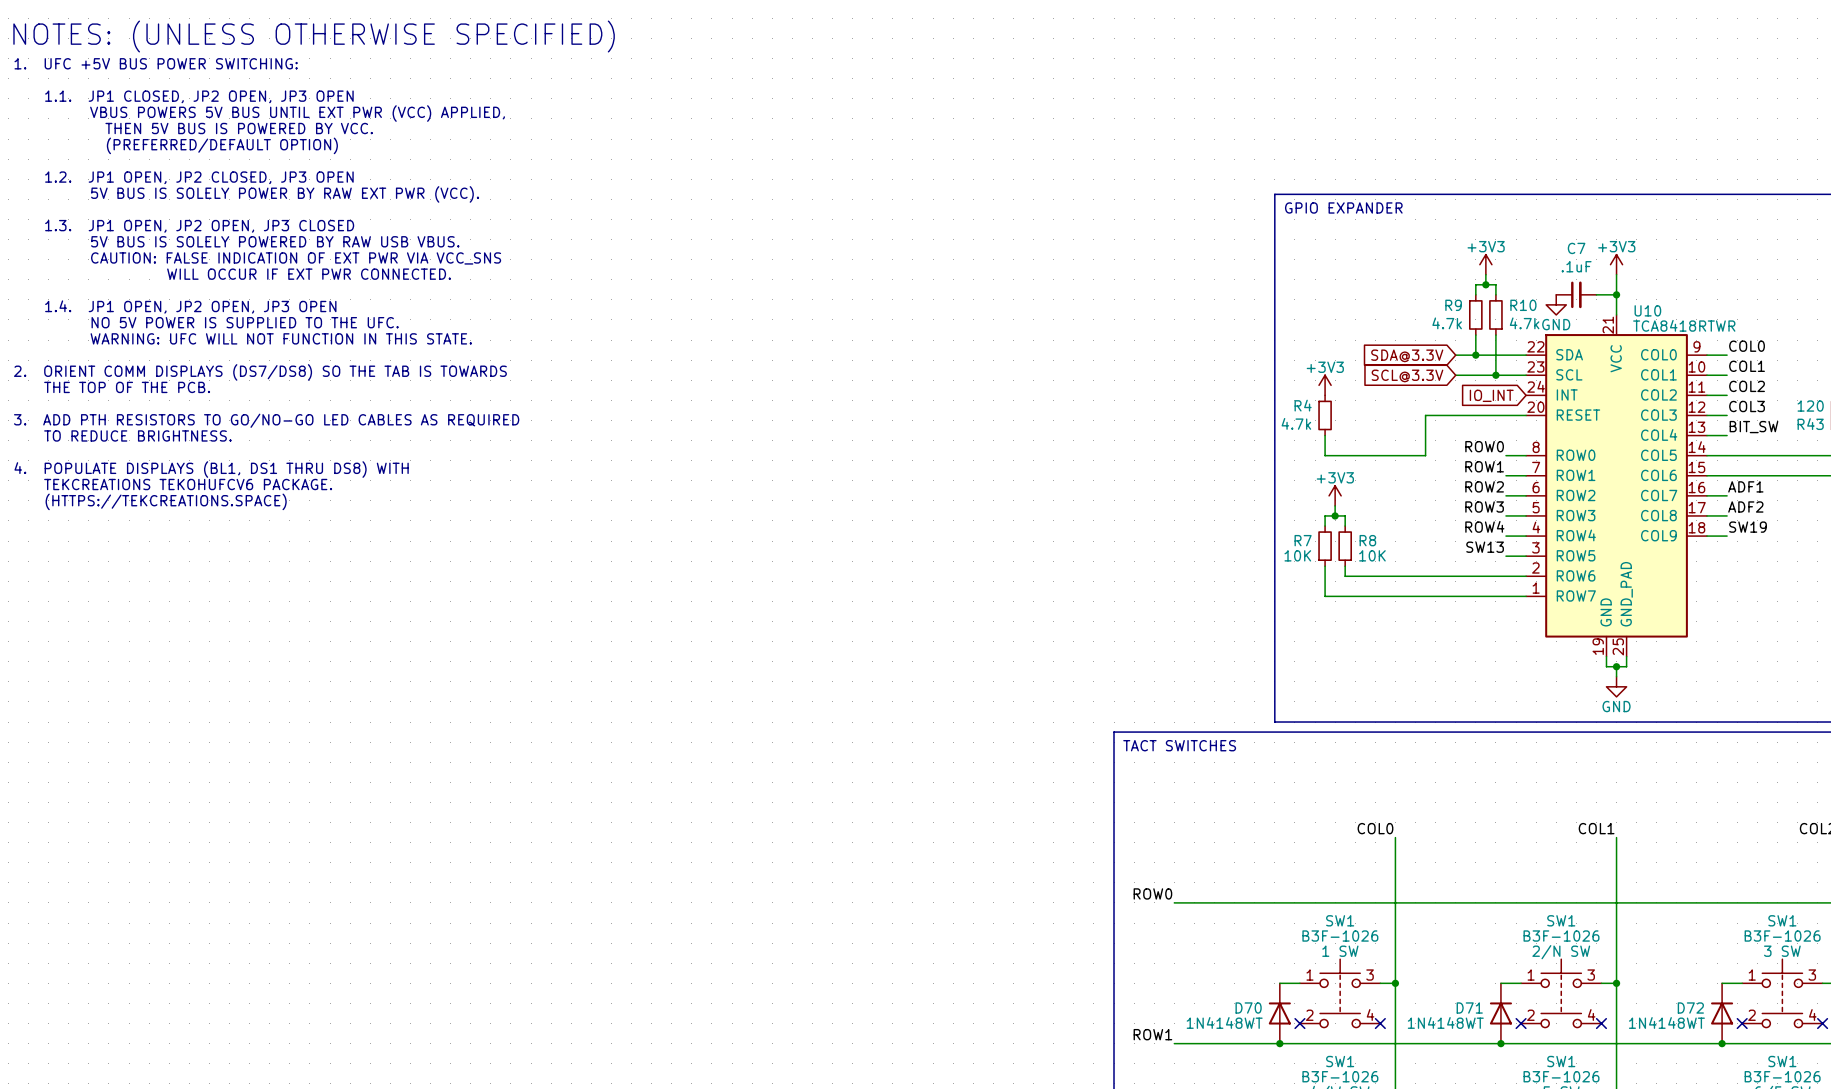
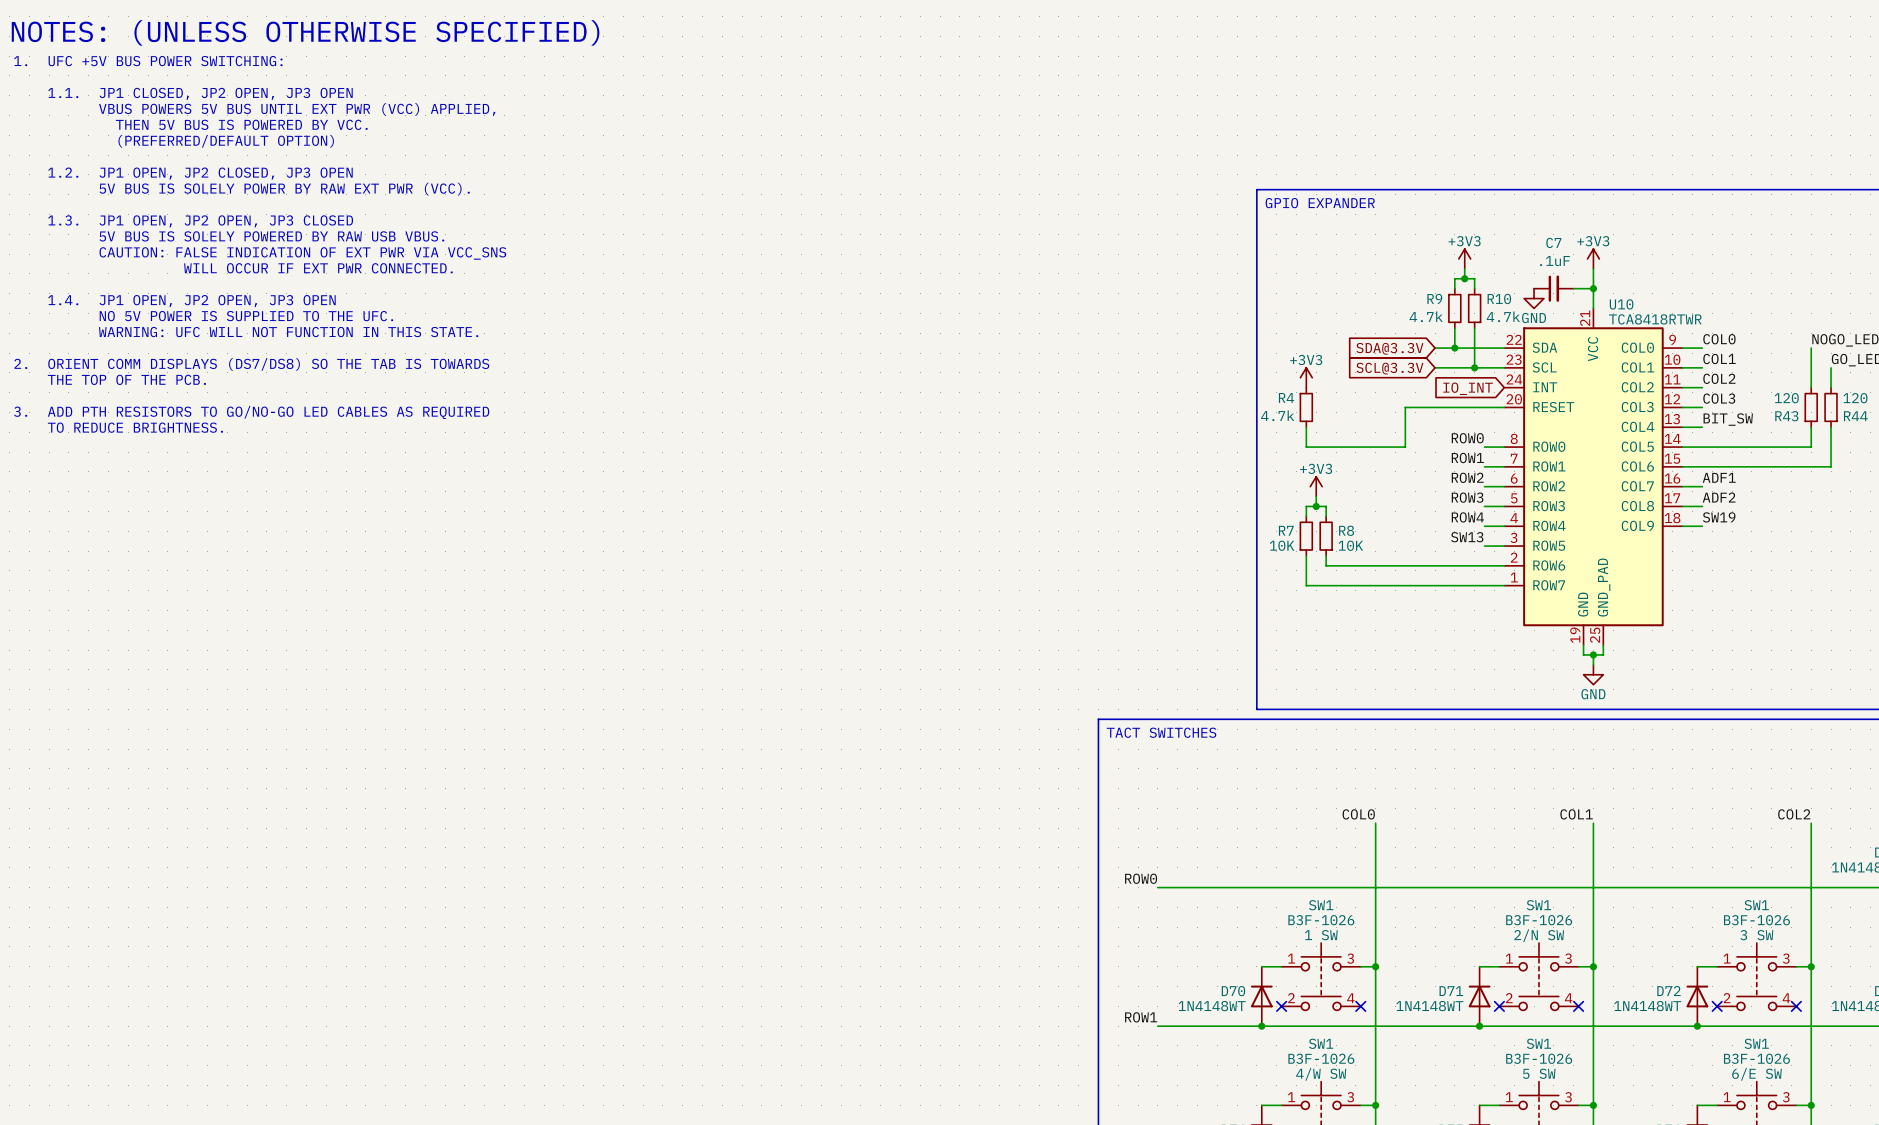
text: 4. POPULATE DISPLAYS (BL1, DS1 THRU DS8) WITH (211, 469) -> none
text: TEKCREATIONS TEKOHUFCV6 PACKAGE. (188, 484) -> none
text: (HTTPS://TEKCREATIONS.SPACE) (166, 501) -> none

